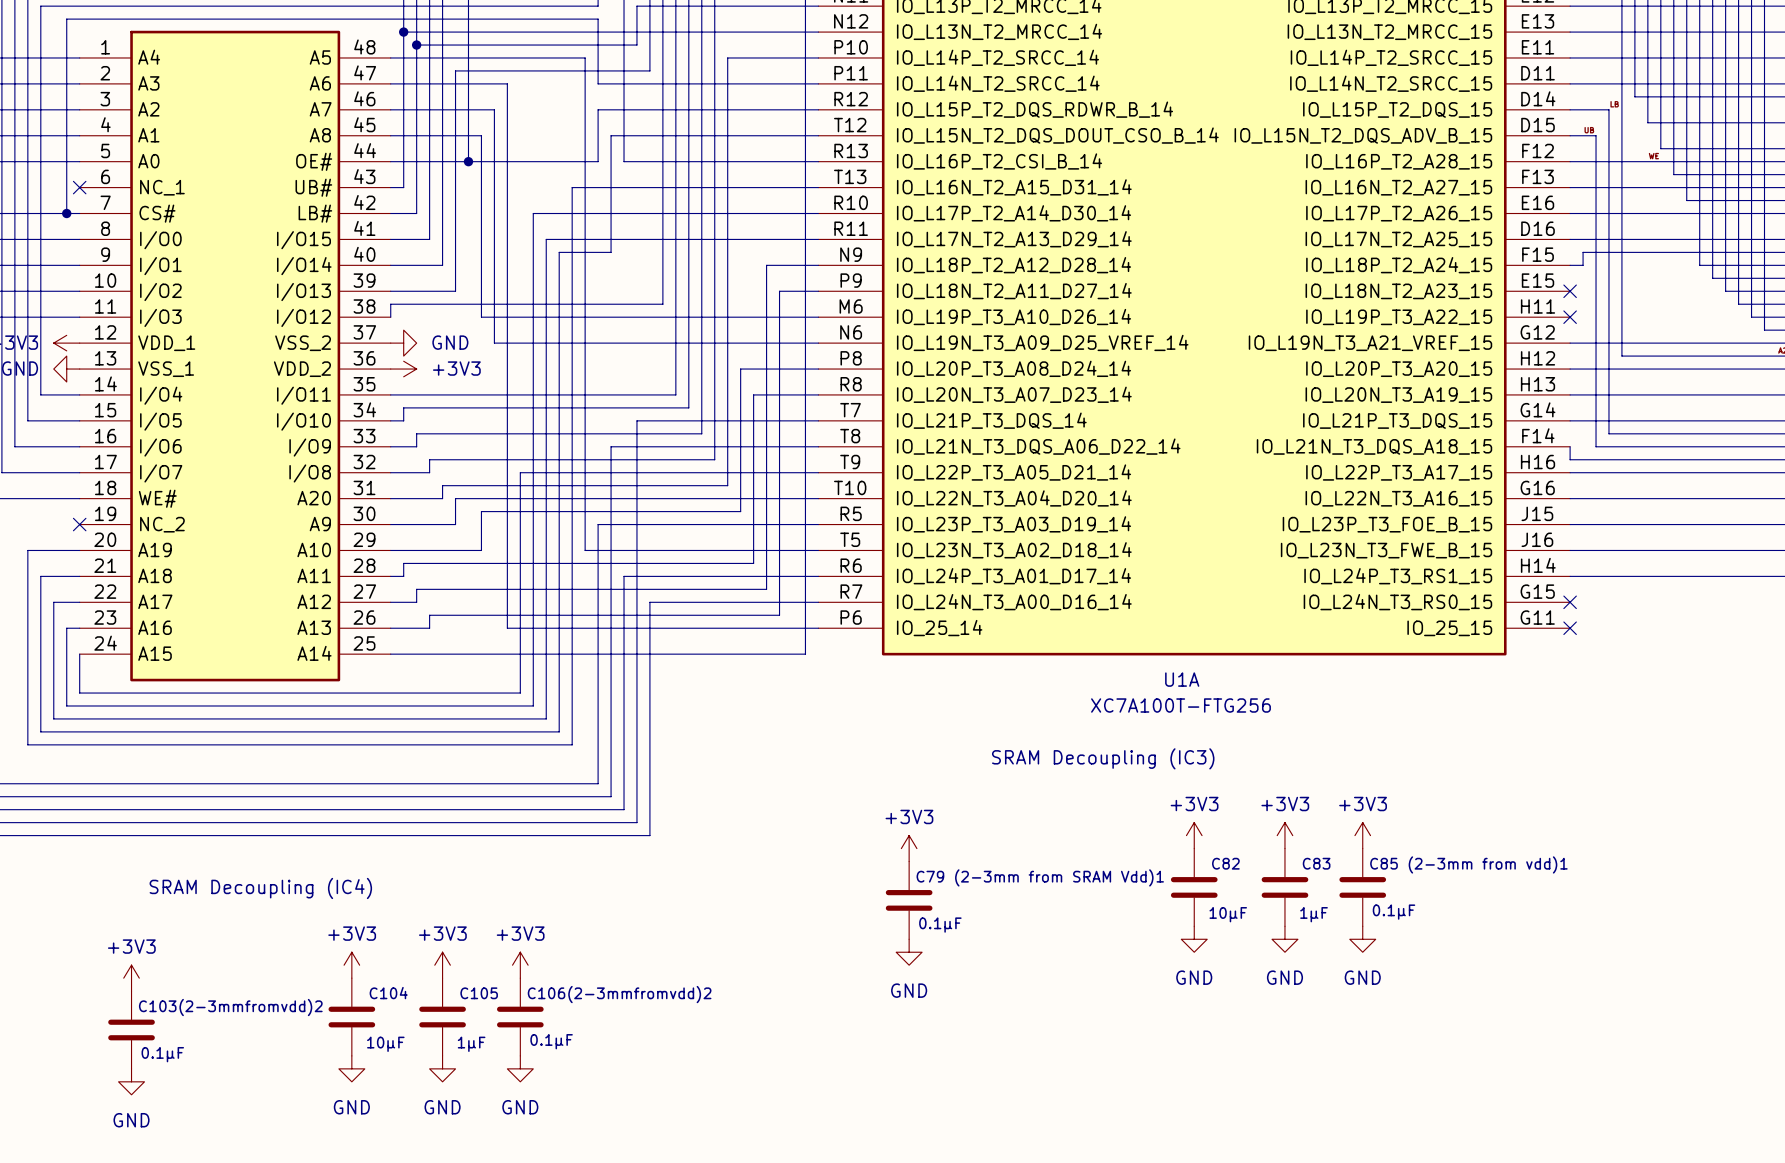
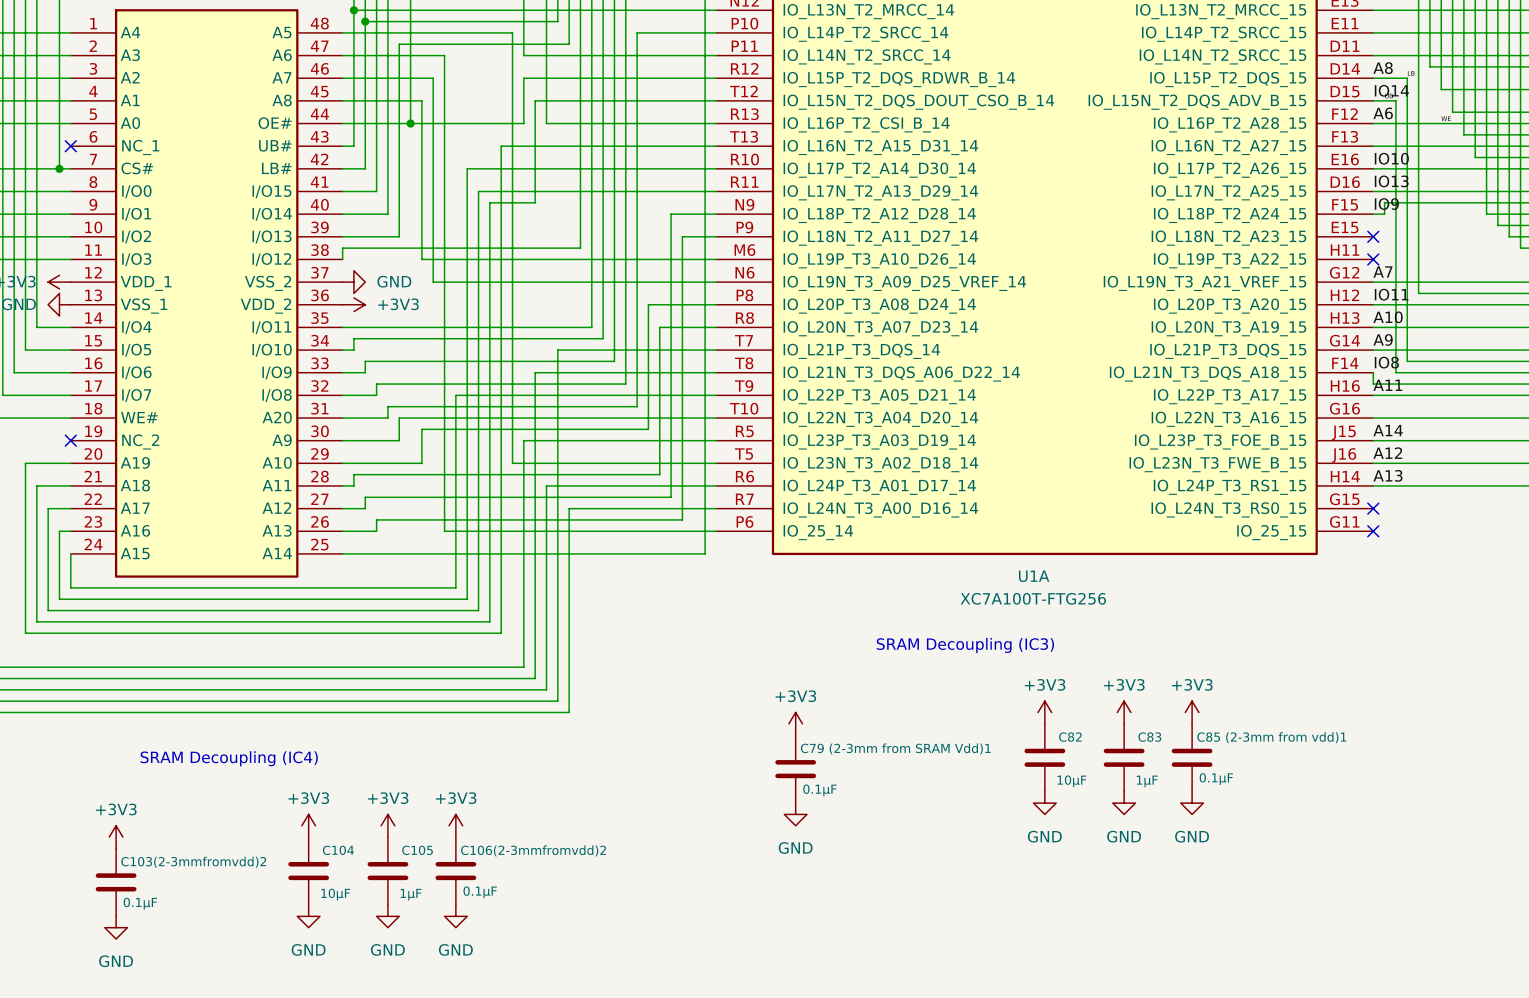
label: none -> A8 (1383, 68)
label: none -> IO14 (1391, 90)
label: none -> A6 (1383, 113)
label: none -> IO10 (1391, 158)
label: none -> IO13 (1391, 181)
label: none -> IO9 (1386, 204)
label: none -> A7 (1382, 272)
label: none -> IO11 (1391, 294)
label: none -> A10 (1388, 317)
label: none -> A9 (1383, 339)
label: none -> IO8 (1386, 362)
label: none -> A11 (1387, 385)
label: none -> A14 (1388, 430)
label: none -> A12 (1387, 453)
label: none -> A13 (1387, 475)

